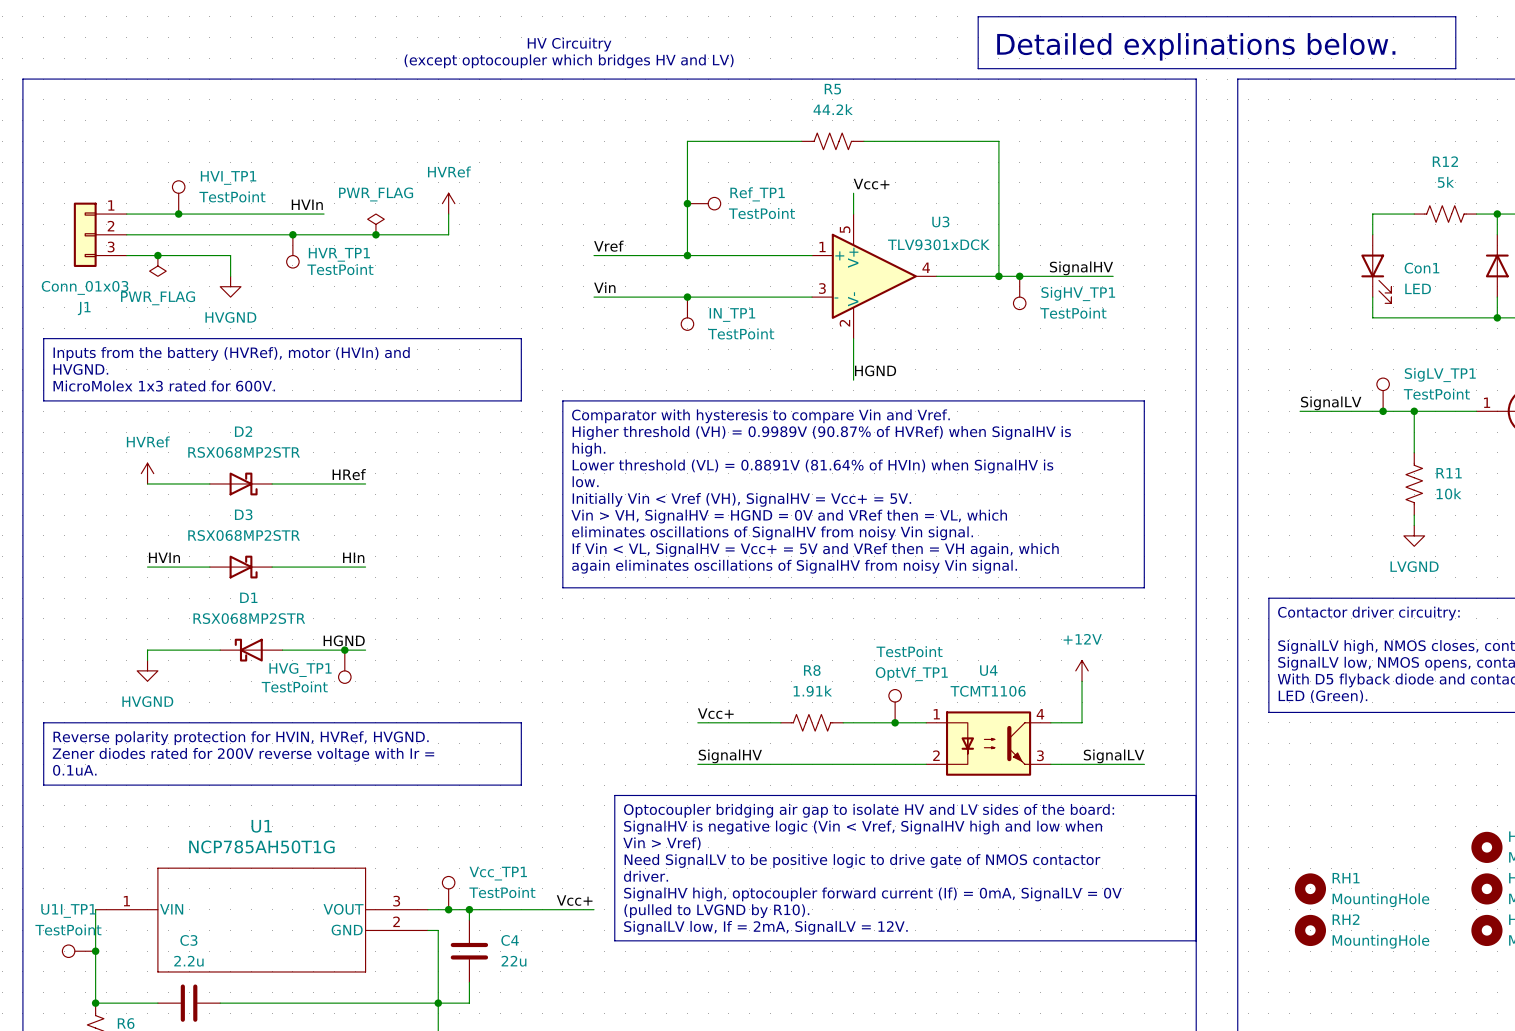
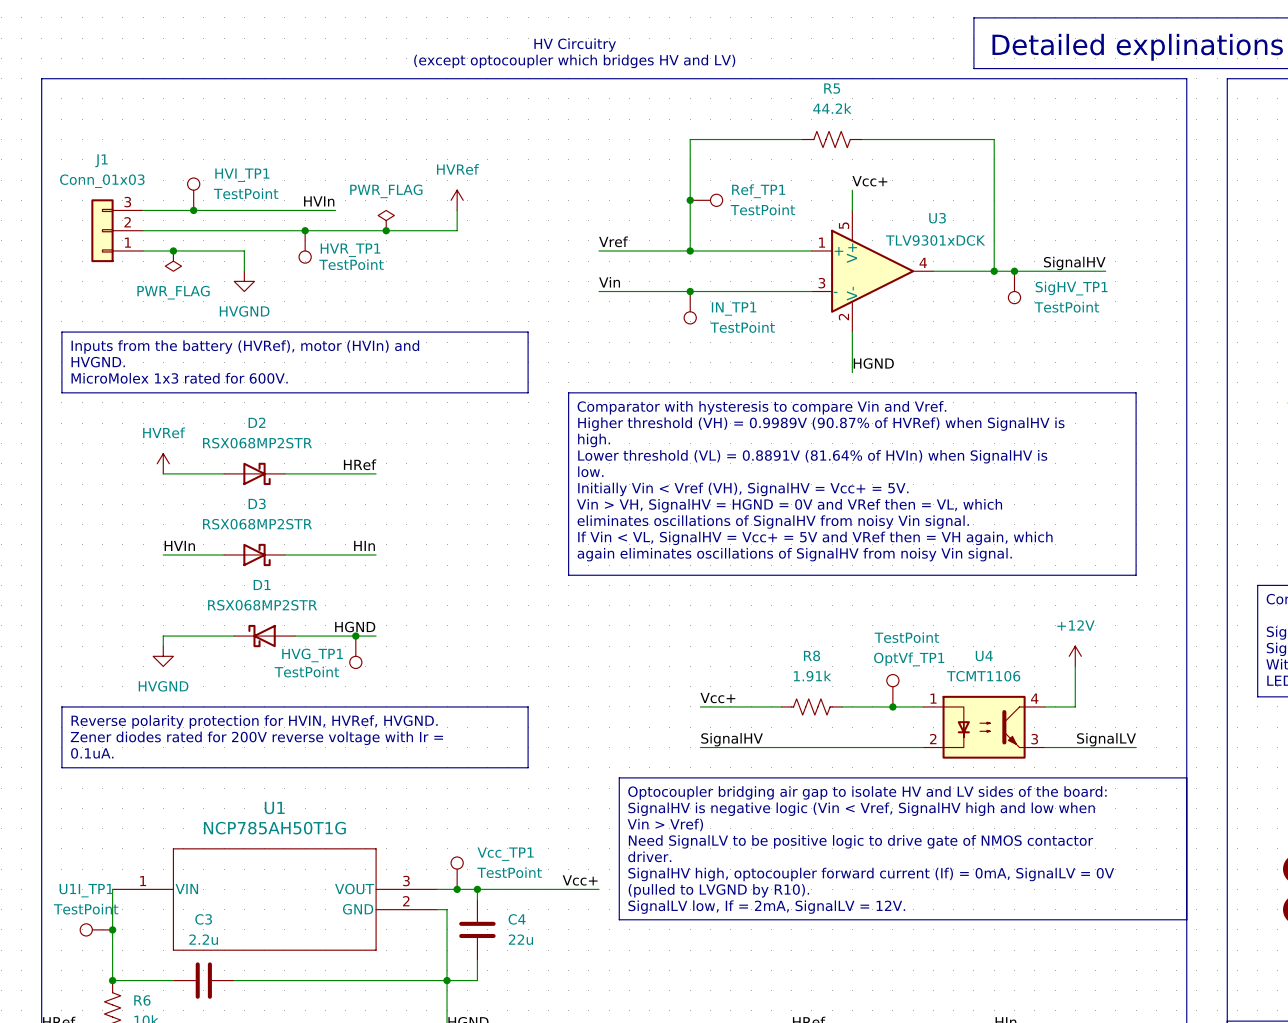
J1 flip: as is (85, 234) -> up-down (102, 230)

